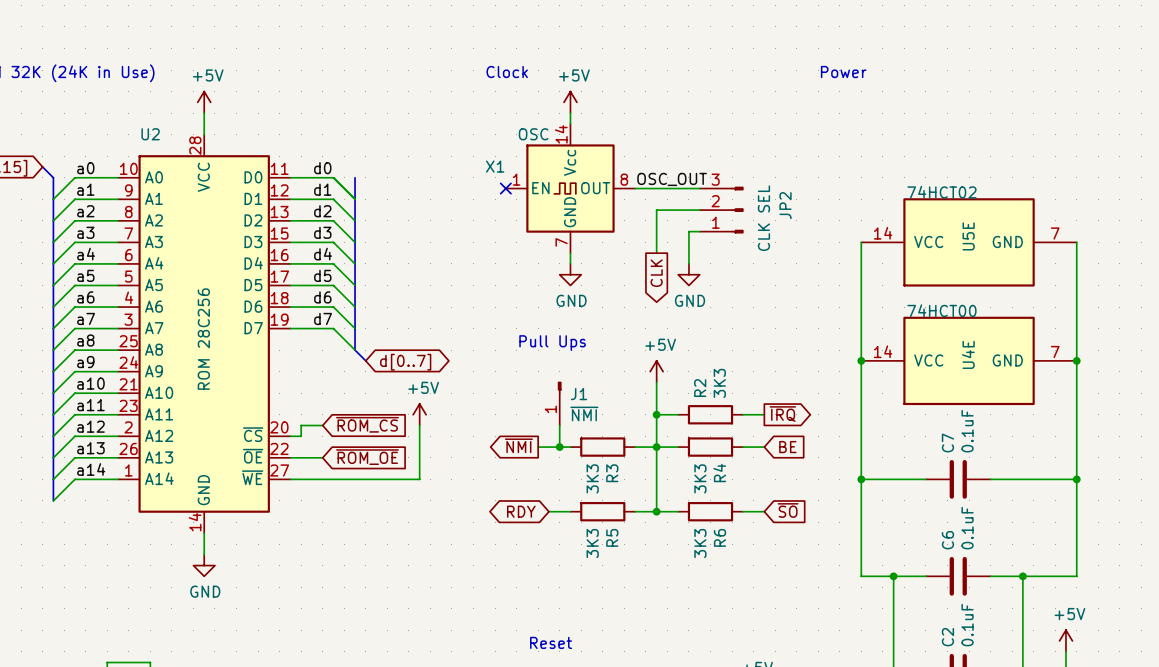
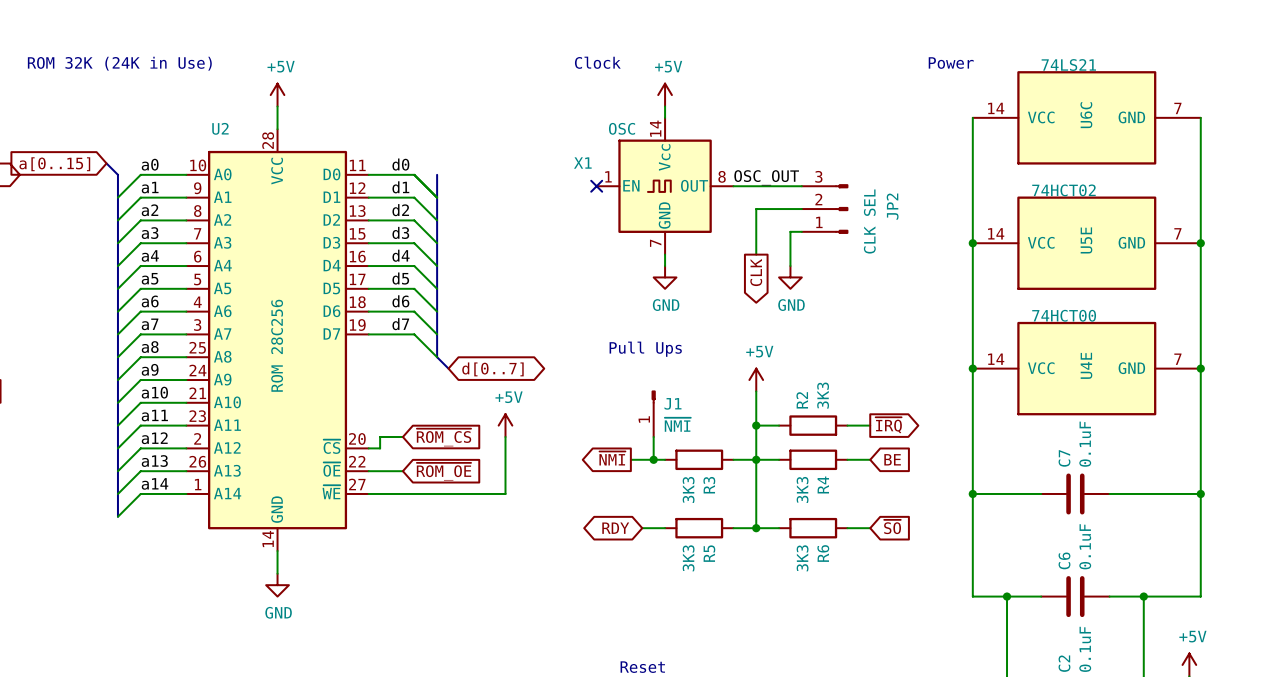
wire: none -> (972, 117) (972, 243)
U6C: none -> 74LS21 (1086, 117)
wire: none -> (1200, 117) (1200, 243)
junction: none -> (972, 243)
junction: none -> (1200, 243)

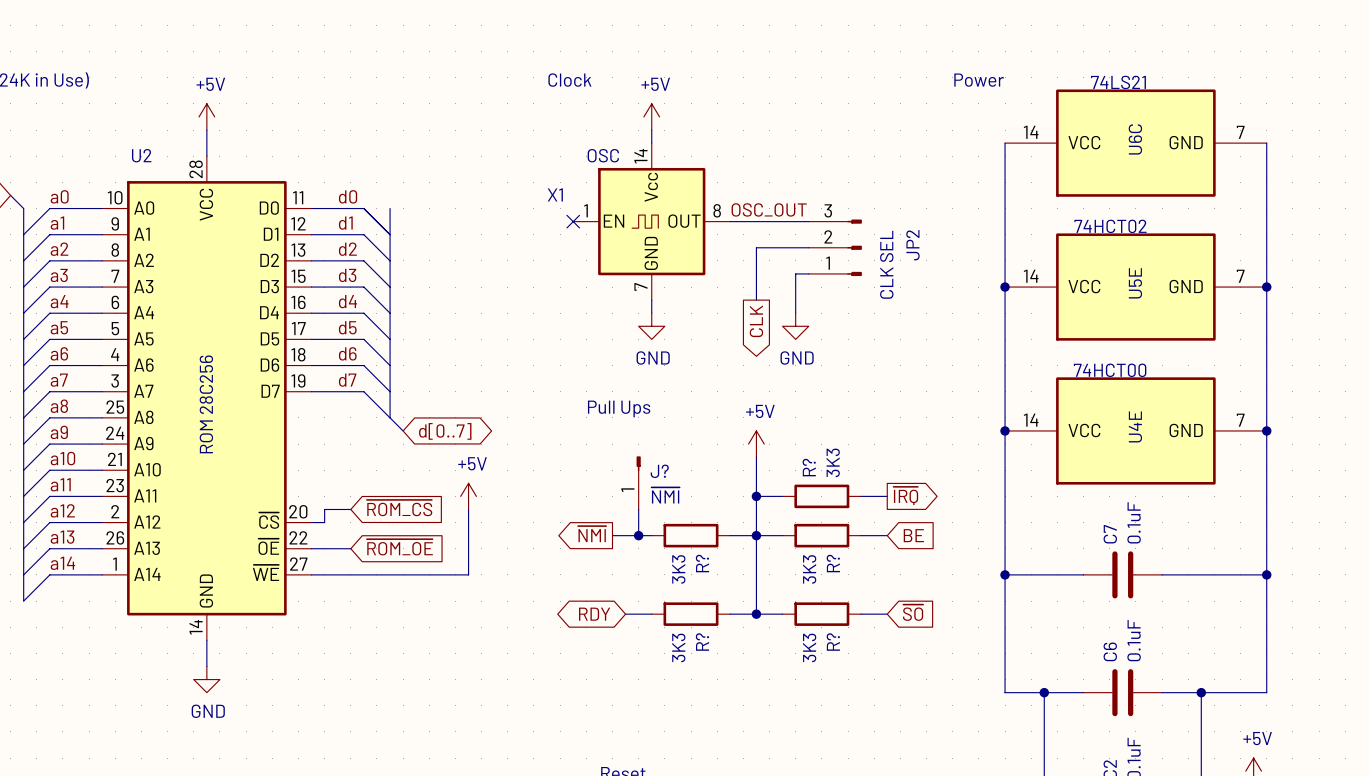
R2 name: R2 (802, 400) -> R? (809, 467)
J1 name: J1 (673, 403) -> J? (659, 471)
R4 name: R4 (823, 484) -> R? (833, 563)
R3 name: R3 (709, 485) -> R? (702, 563)
R5 name: R5 (709, 553) -> R? (702, 642)
R6 name: R6 (823, 553) -> R? (833, 642)

